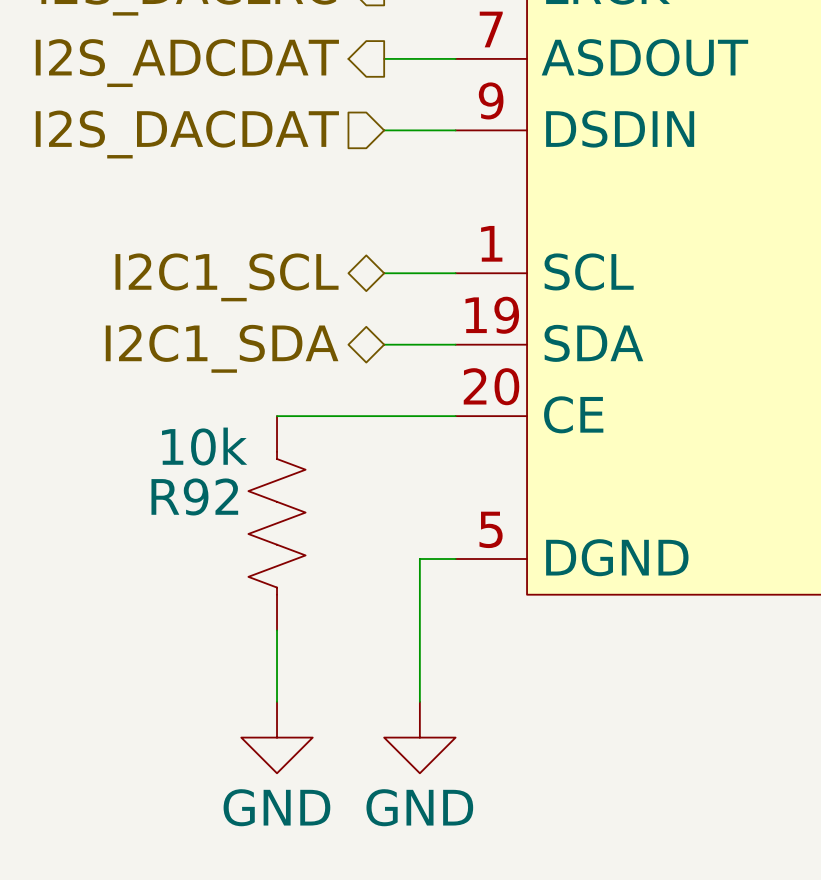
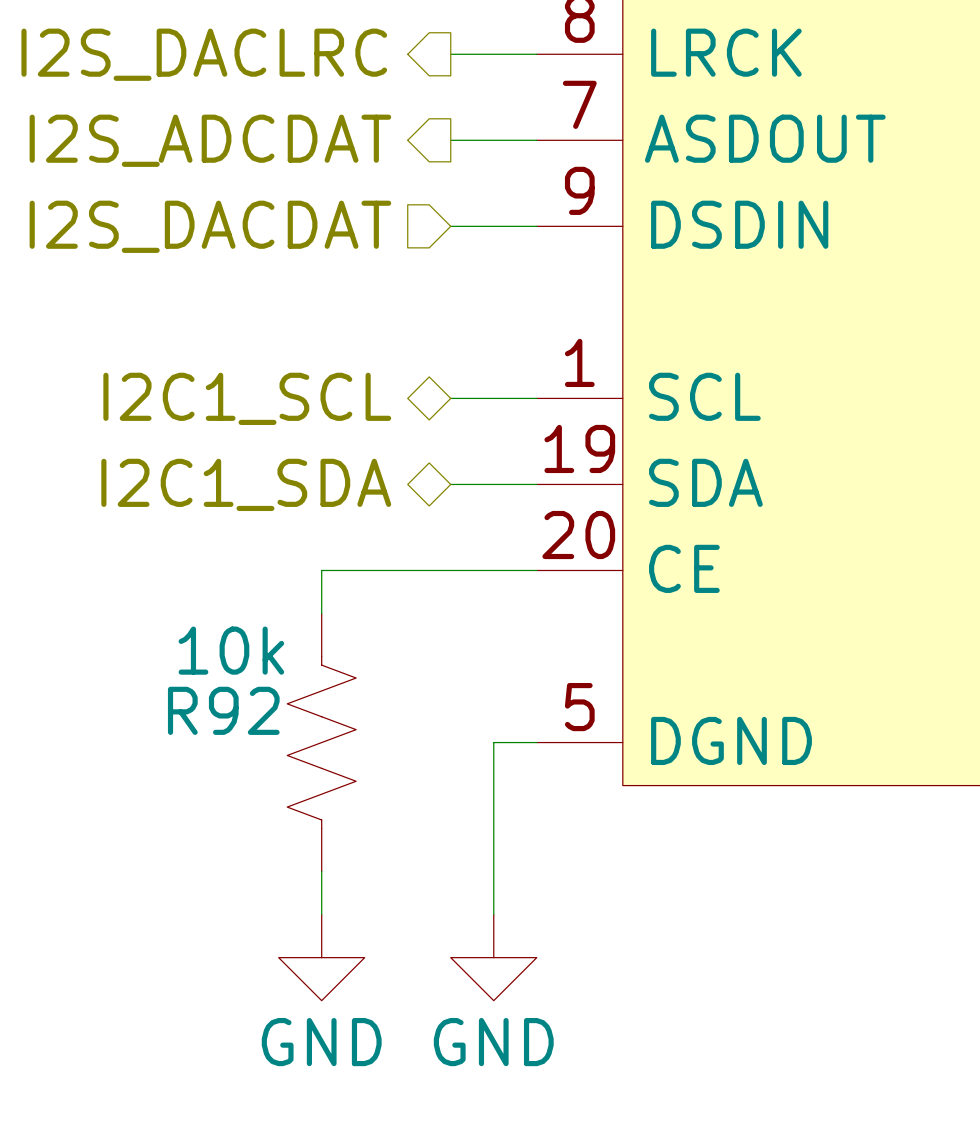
R92 position: (277, 523) -> (321, 742)

